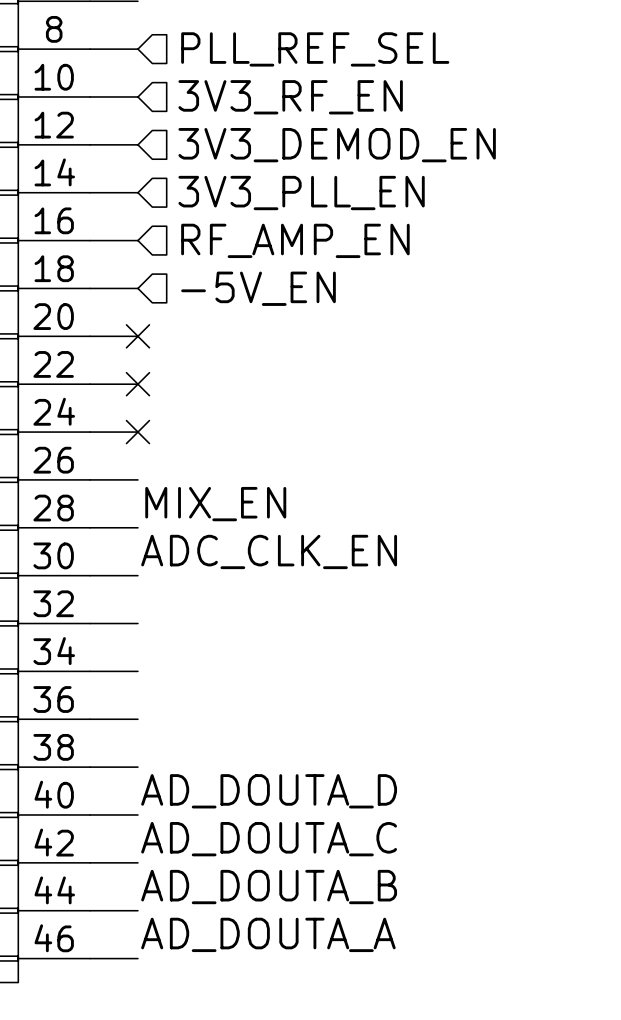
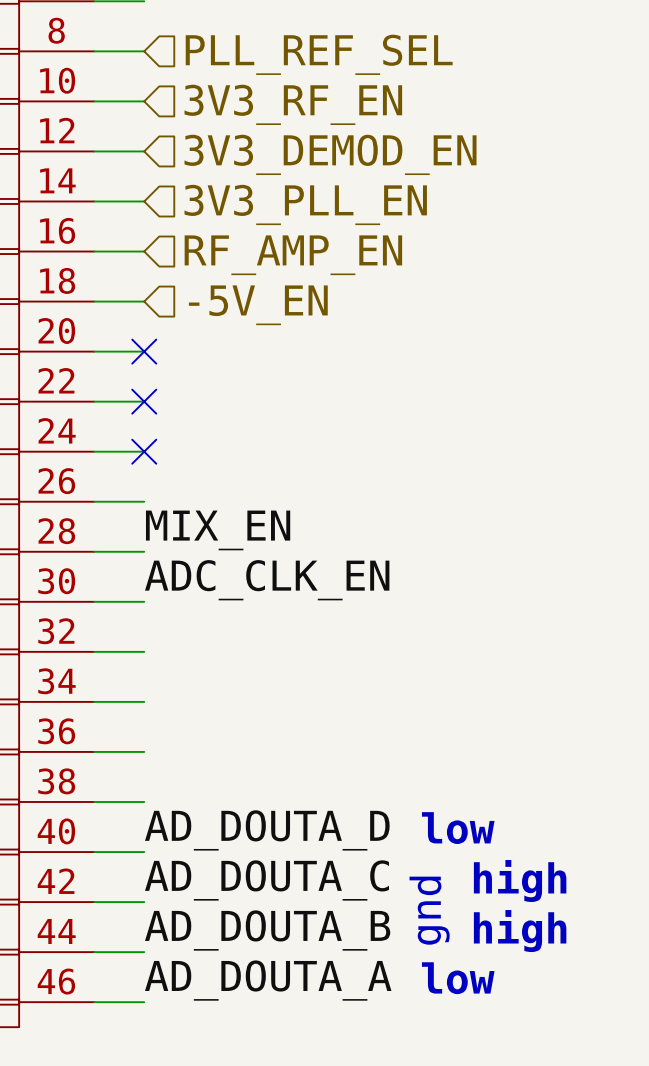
text: none -> low (458, 828)
text: none -> high (520, 881)
text: none -> gnd (429, 910)
text: none -> high (520, 931)
text: none -> low (458, 978)

